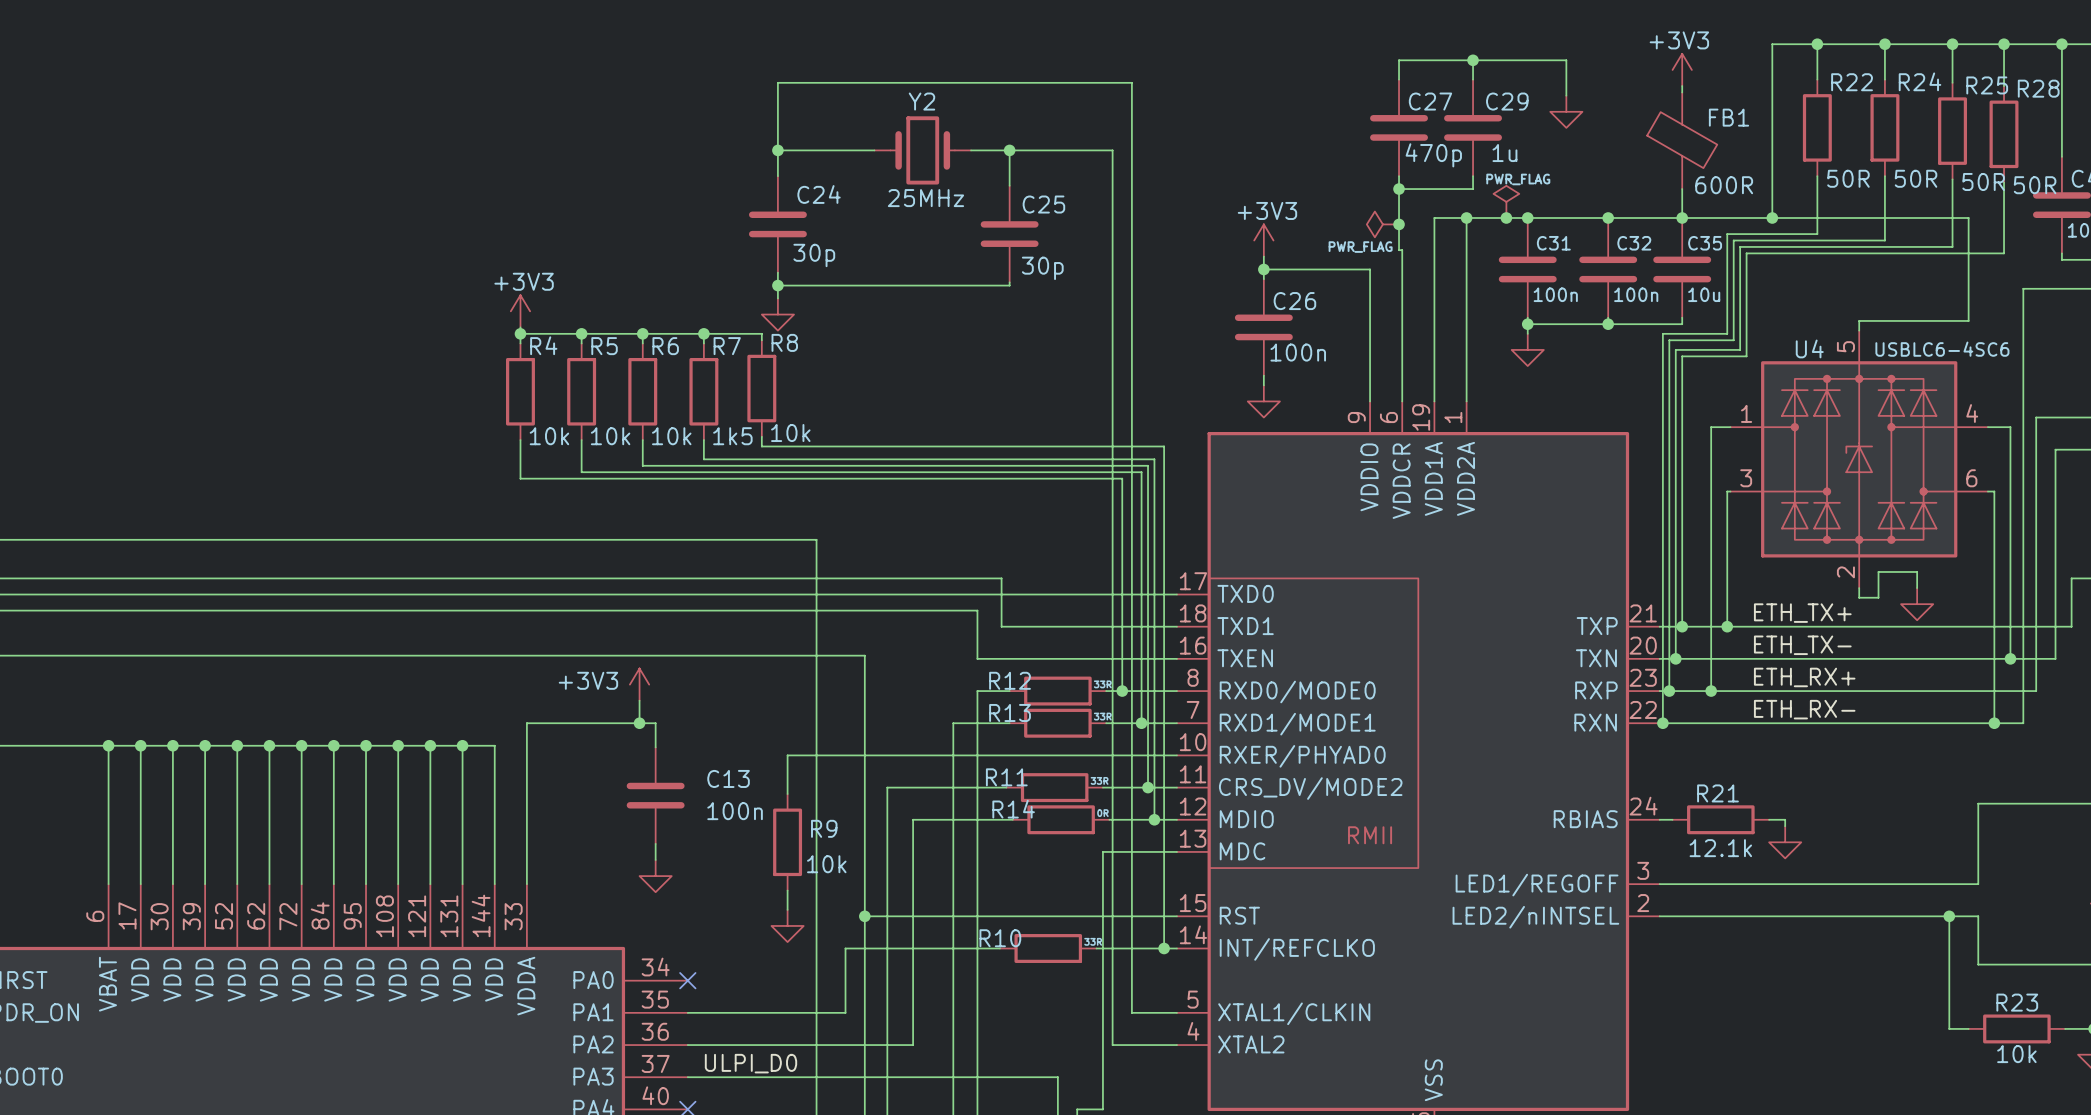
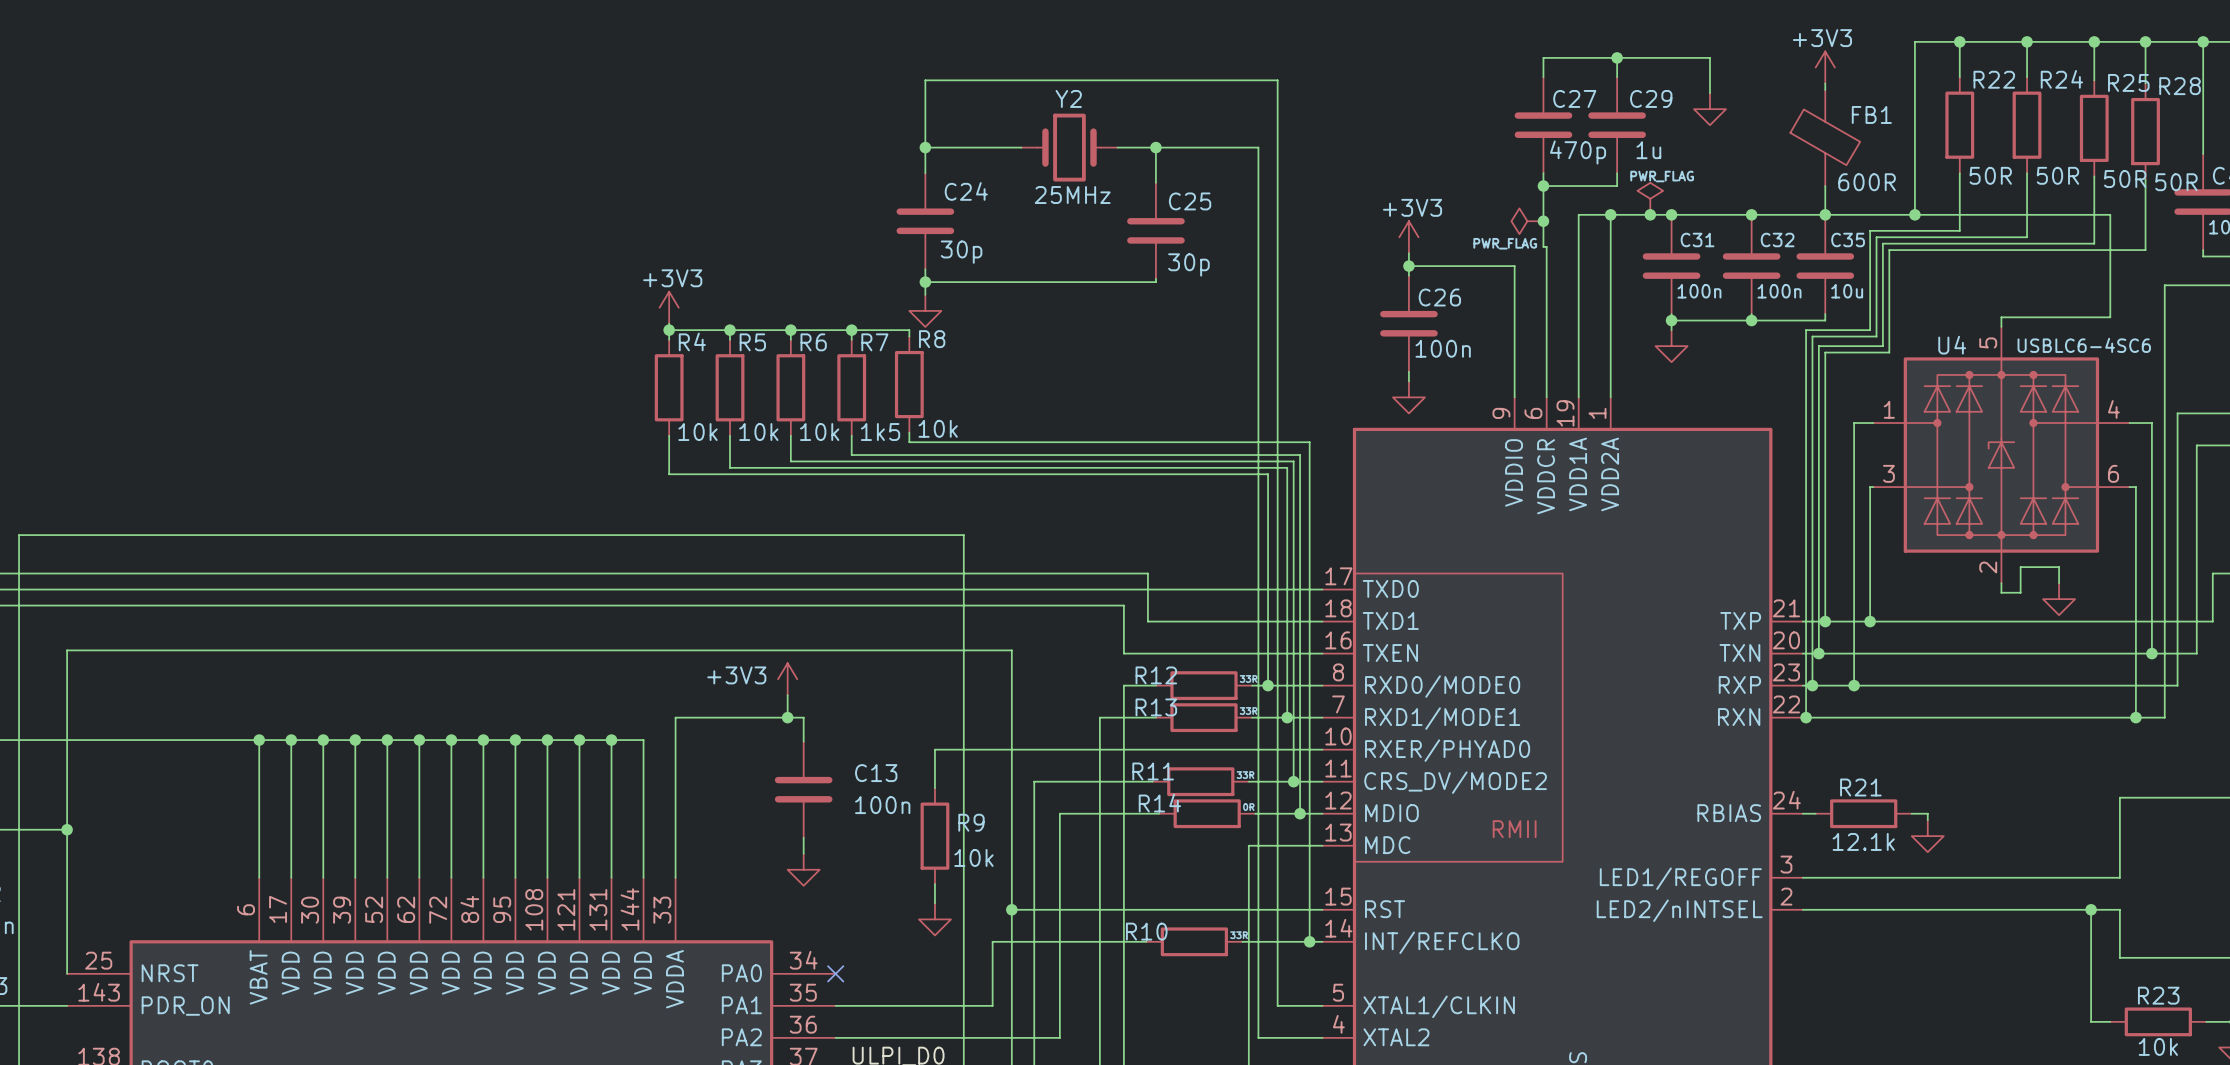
label: ETH_TX+ (1802, 613) -> none
label: ETH_TX- (1802, 645) -> none
label: ETH_RX+ (1804, 677) -> none
label: ETH_RX- (1804, 709) -> none

